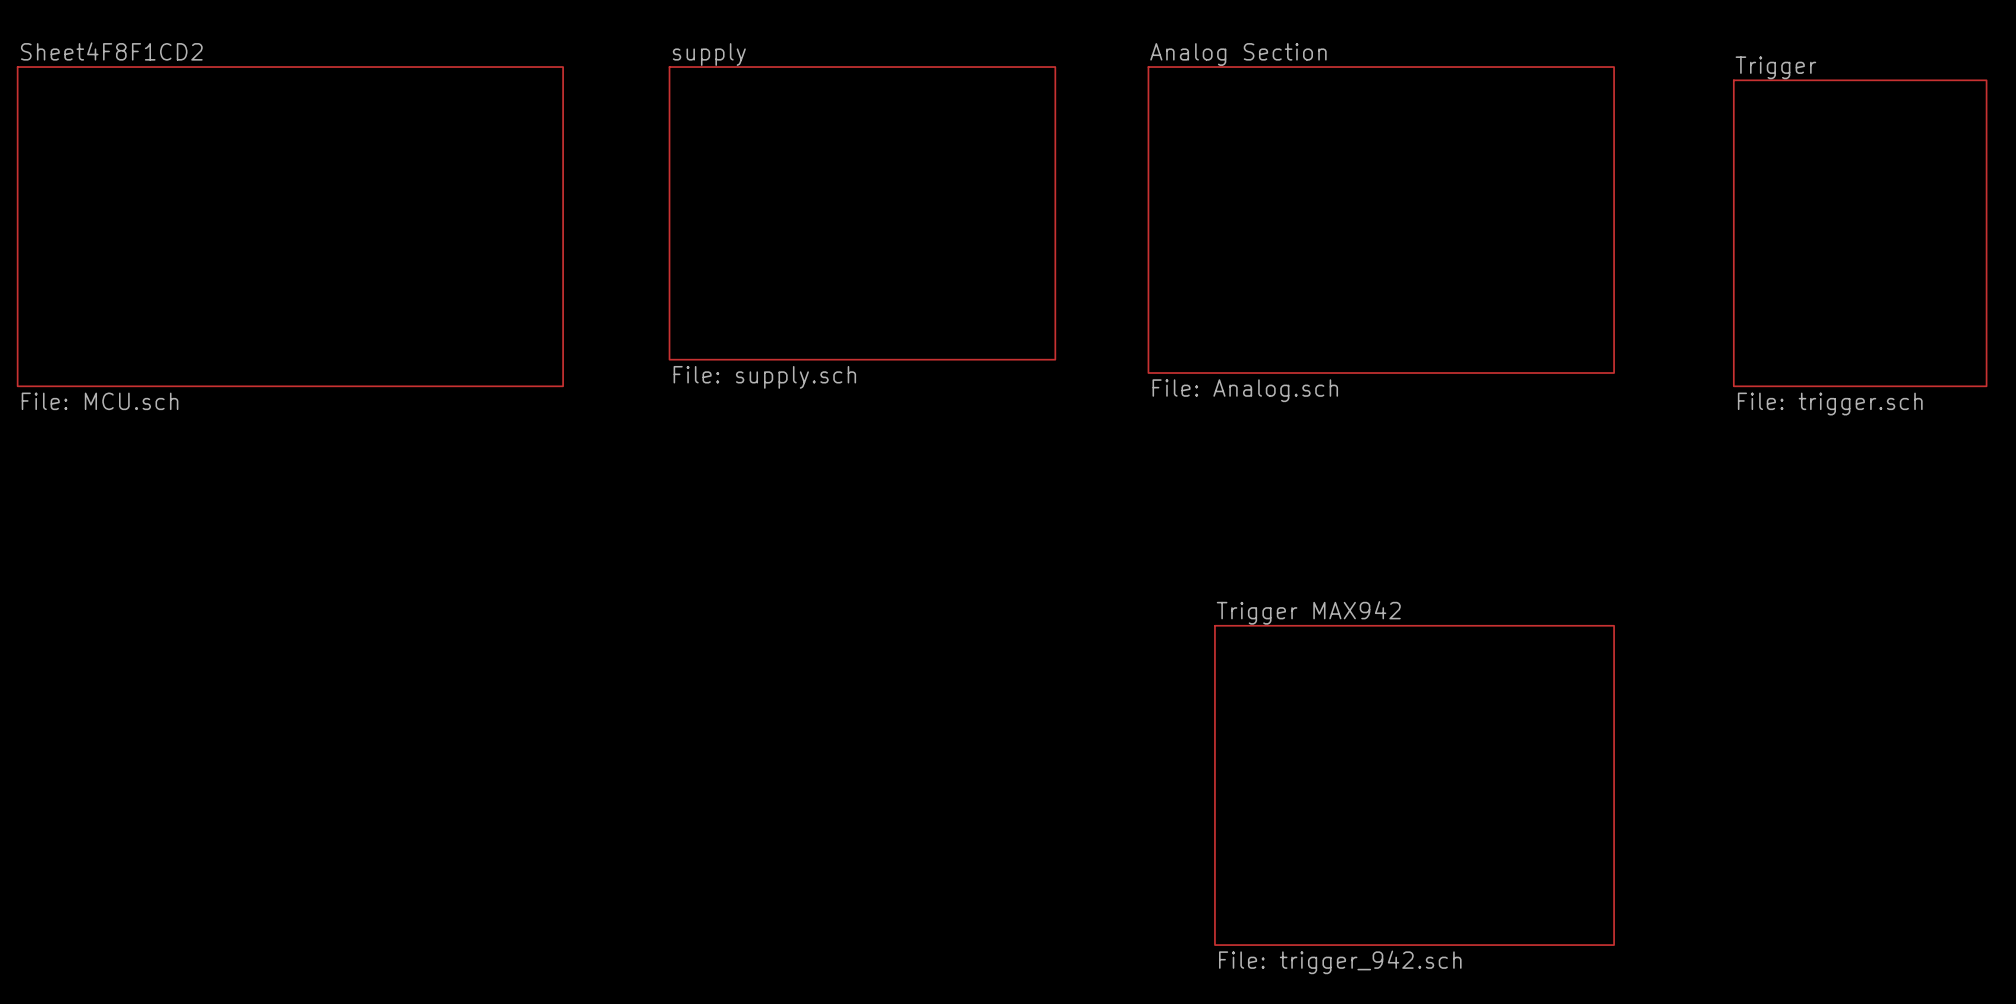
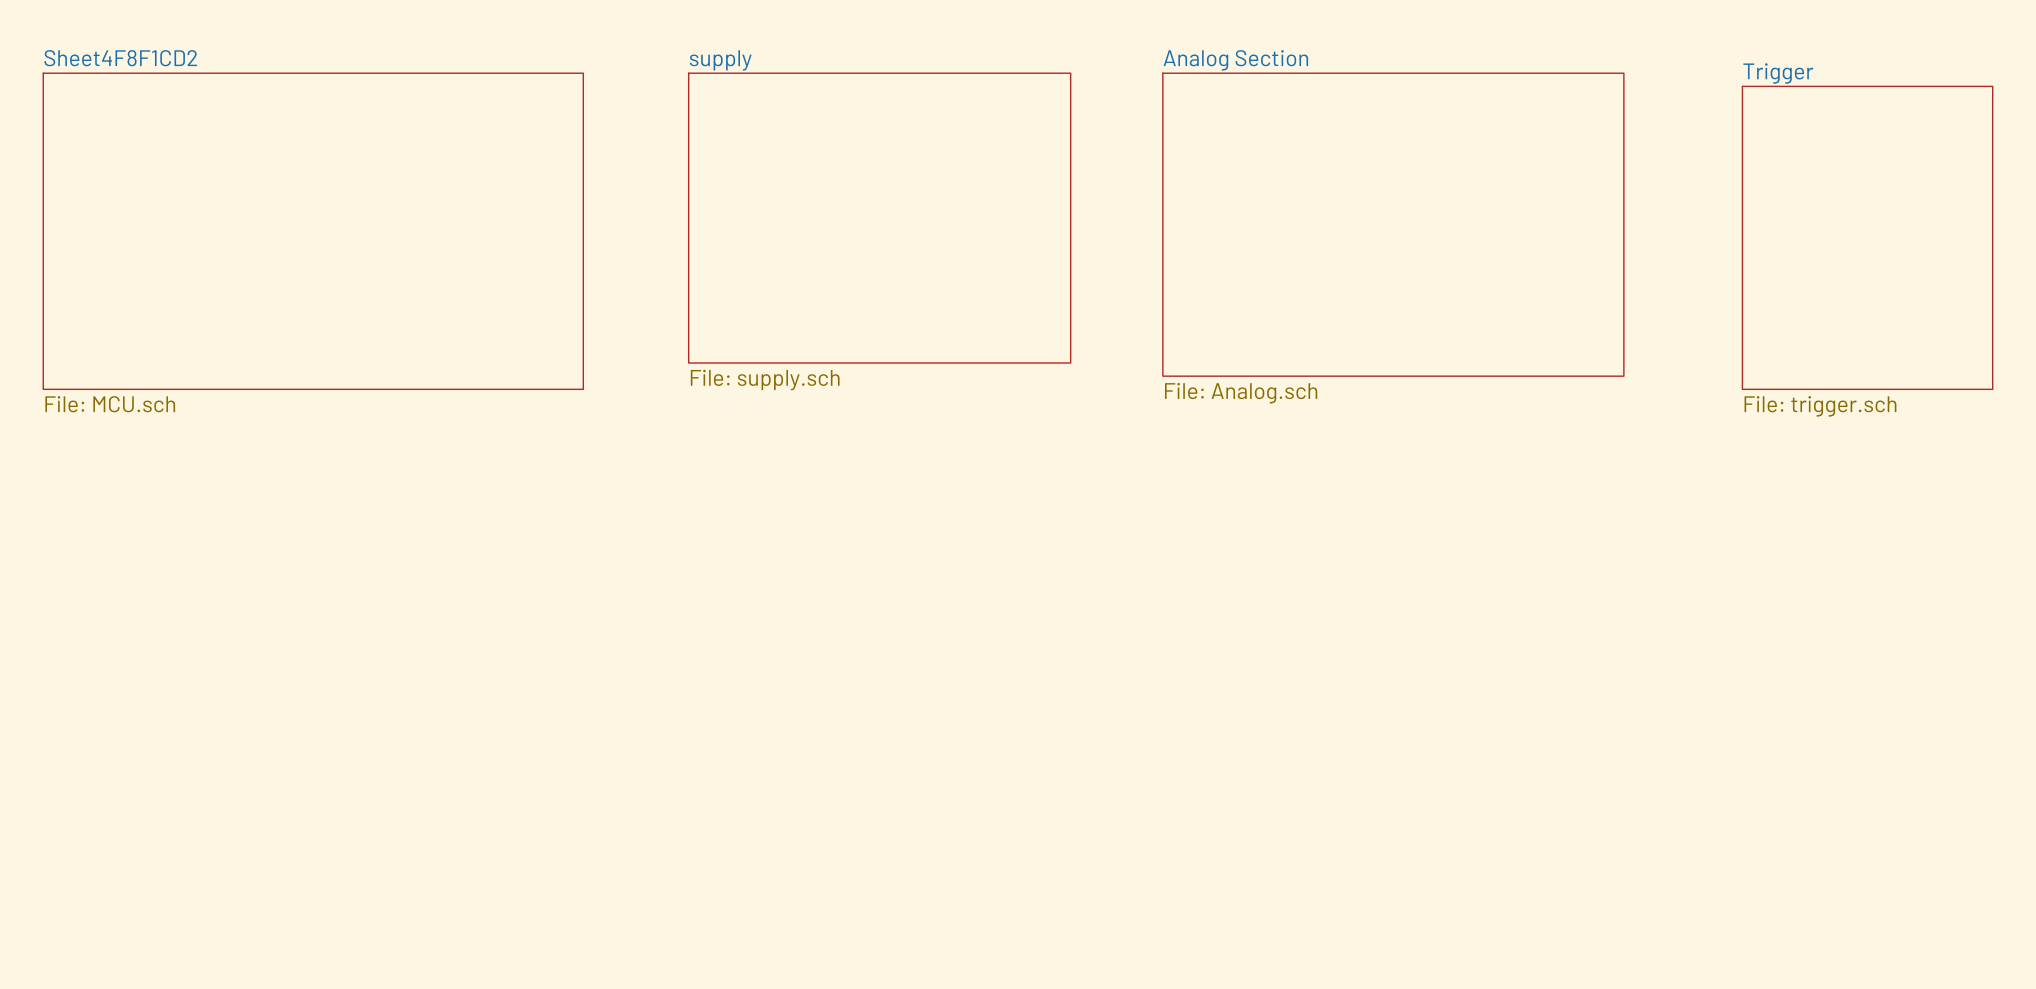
sheet Trigger MAX942: File: trigger_942.sch (1414, 785) -> none

